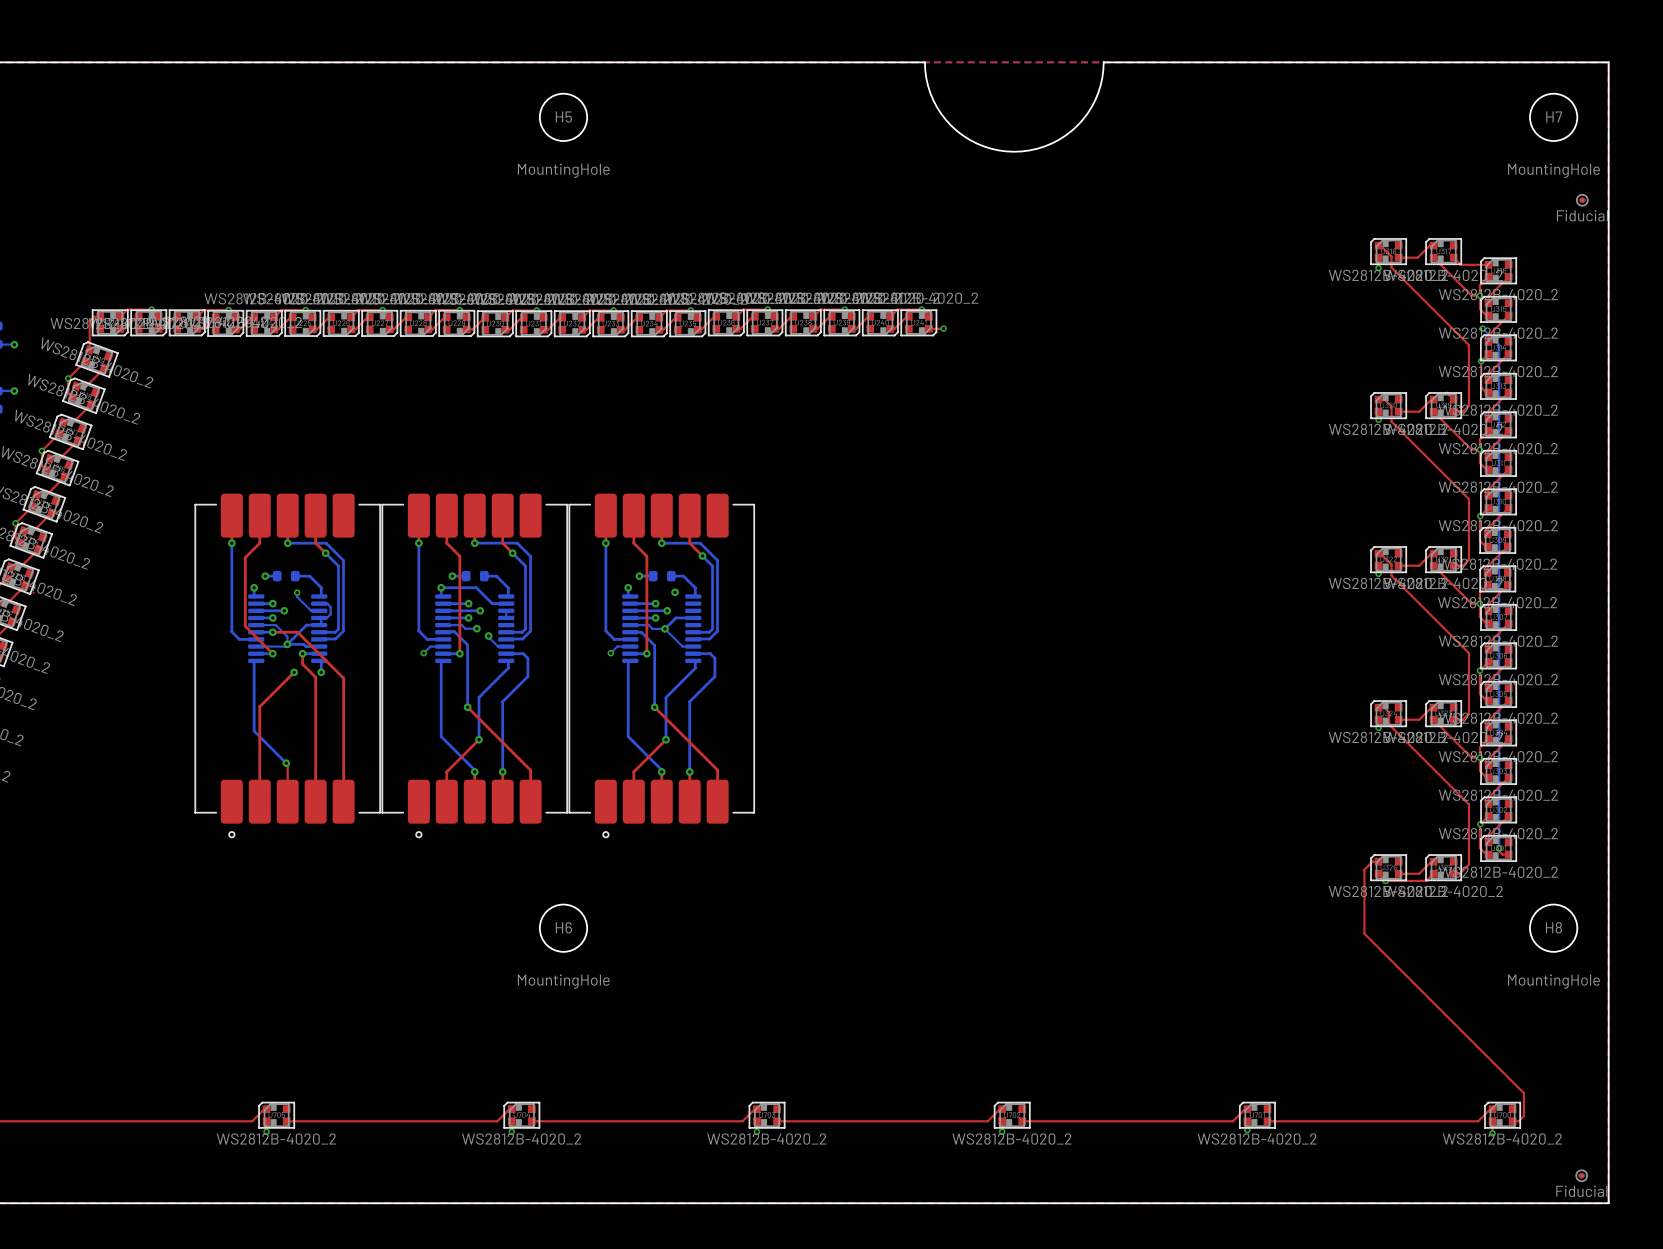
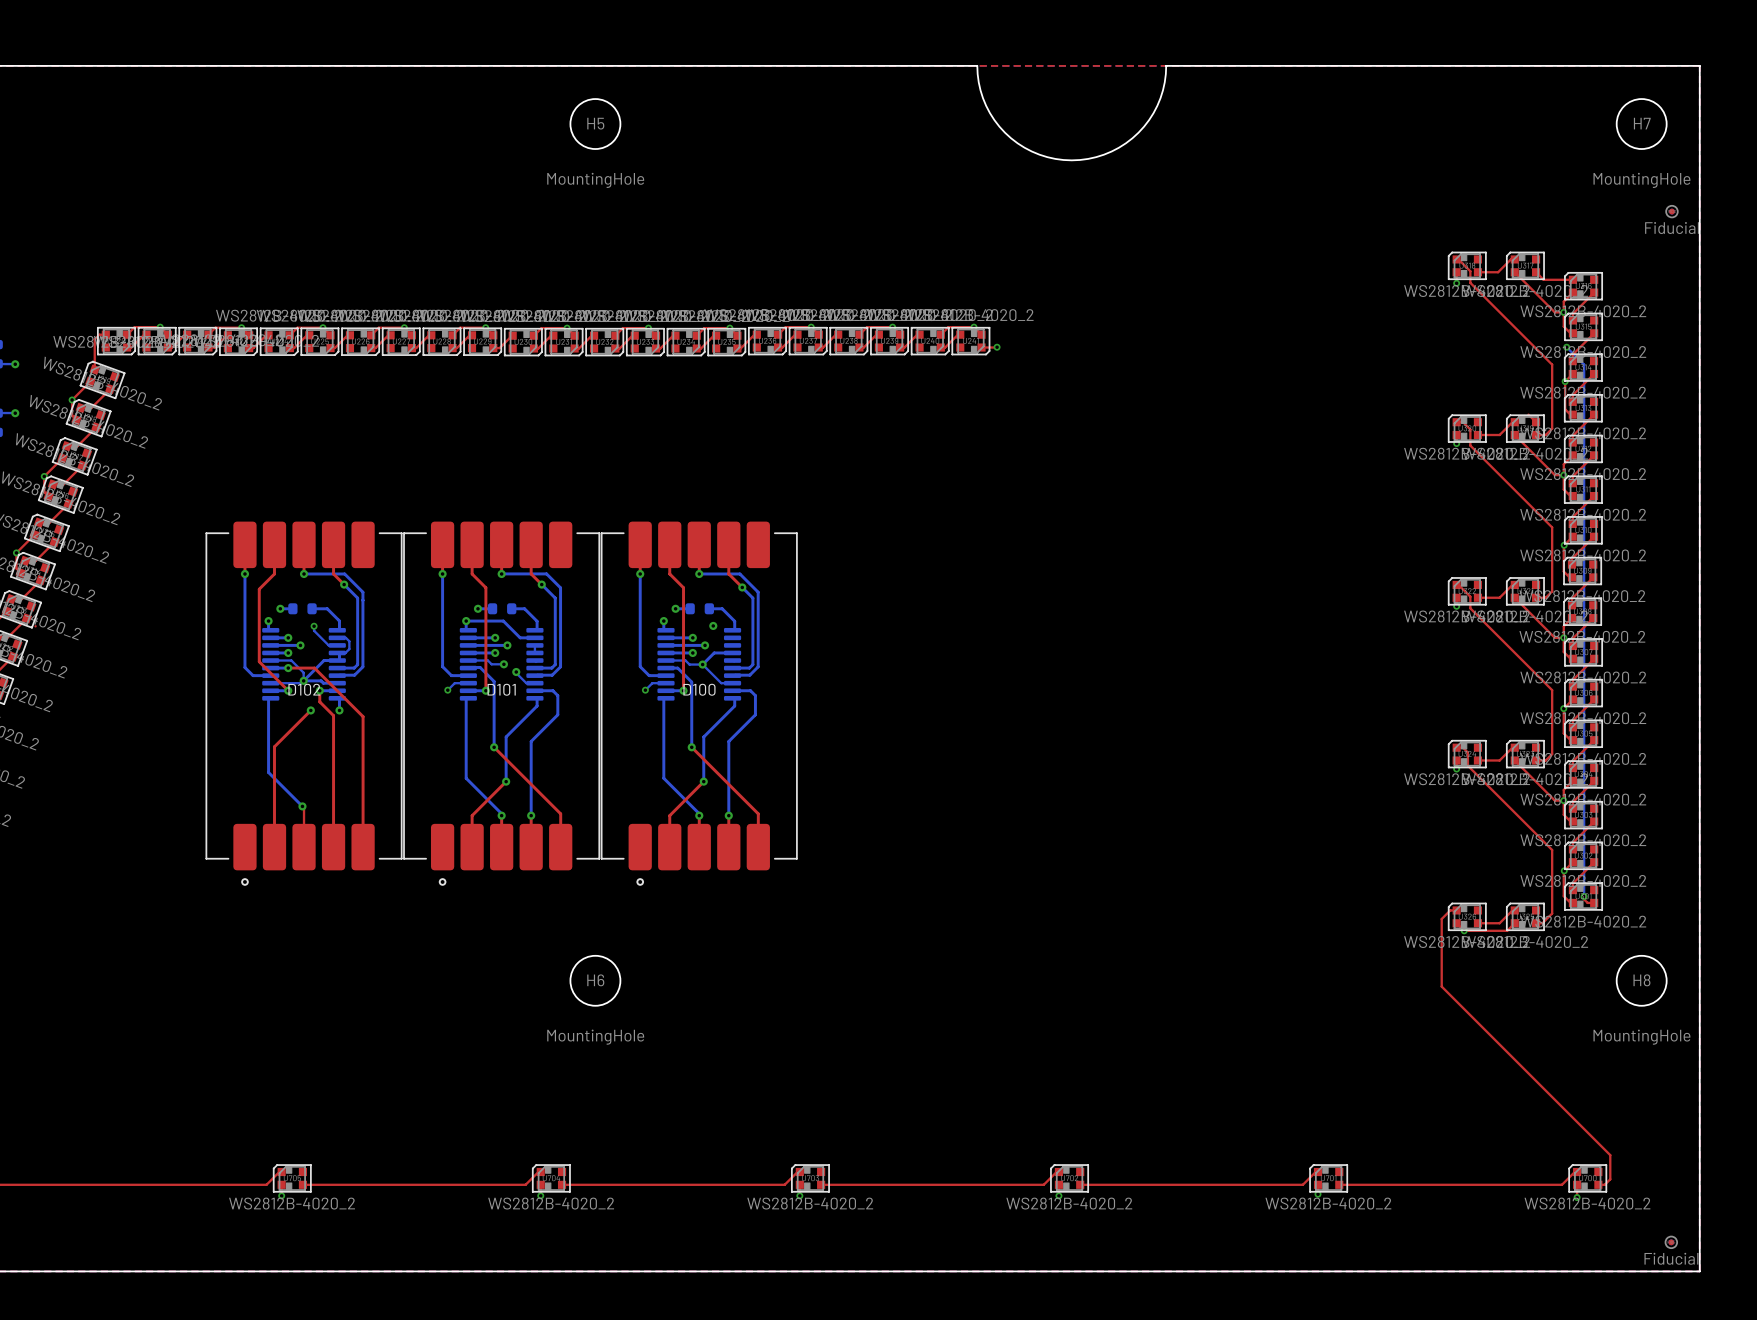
D102 name: none -> D102 (304, 689)
D101 name: none -> D101 (501, 689)
D100 name: none -> D100 (699, 689)

